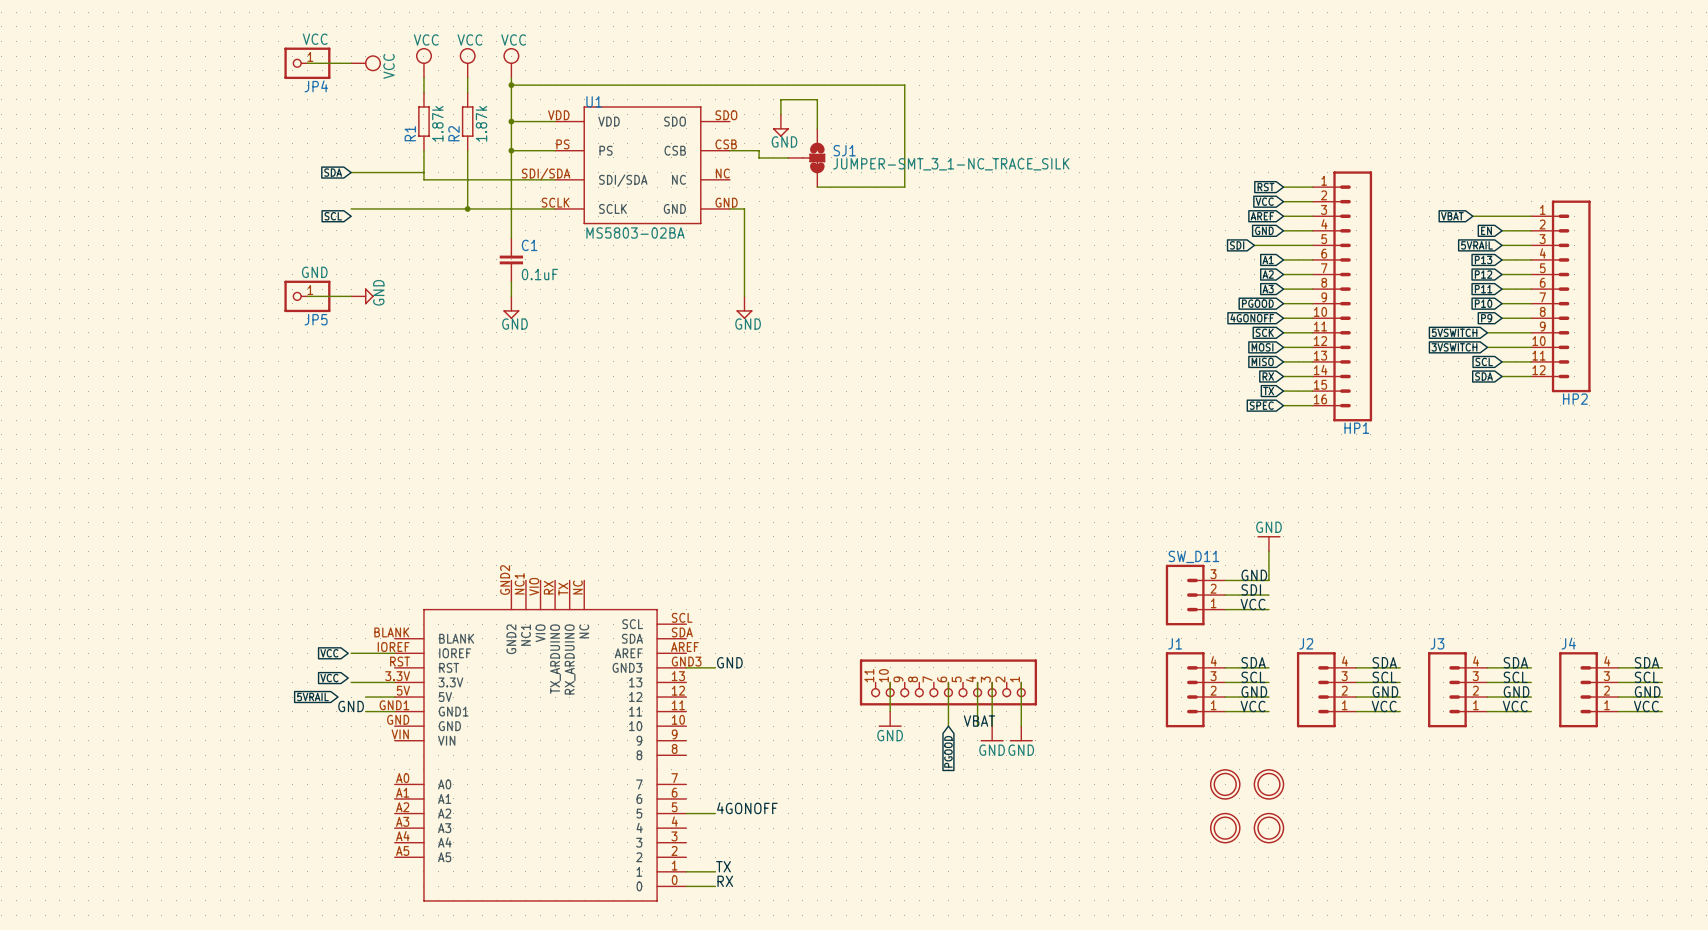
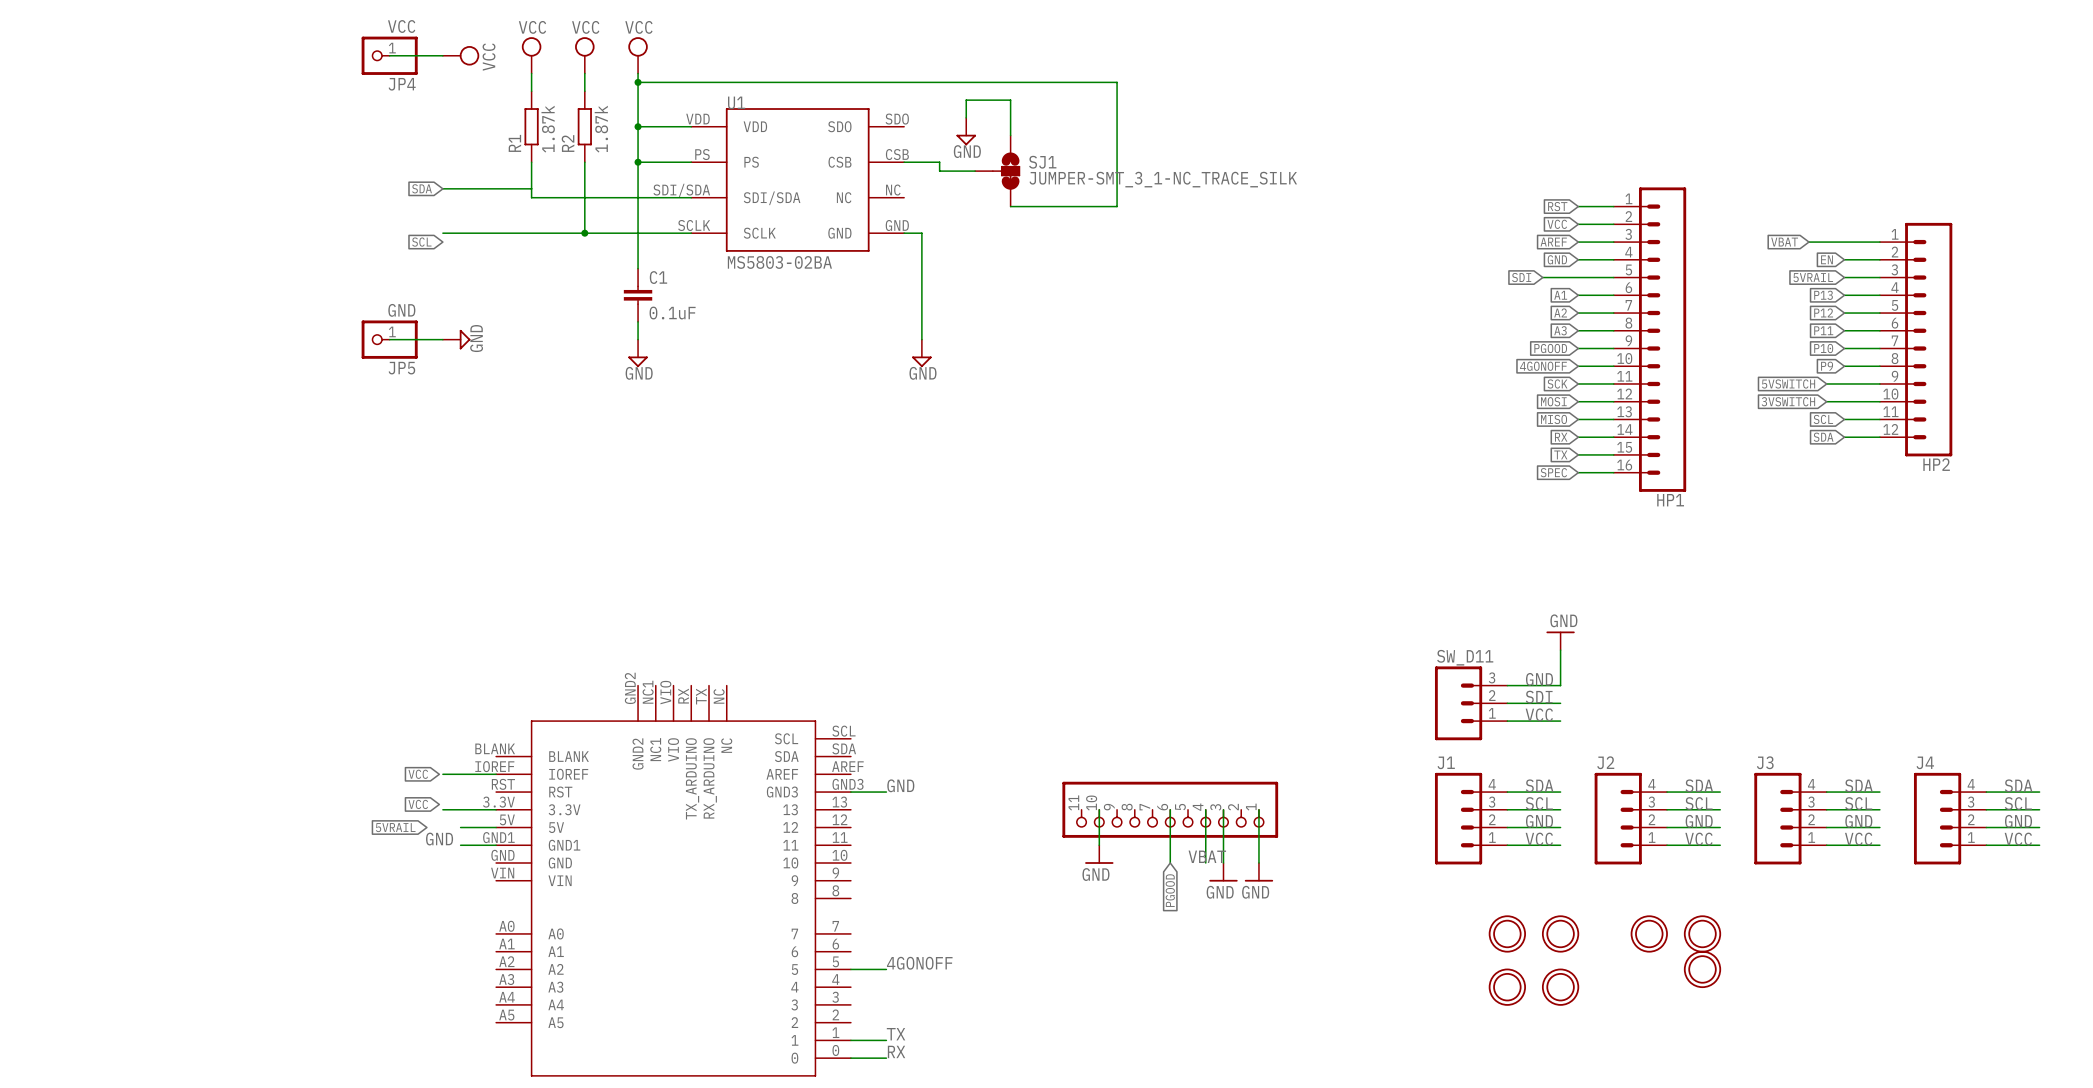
part: none -> (1649, 933)
part: none -> (1702, 933)
part: none -> (1702, 969)

